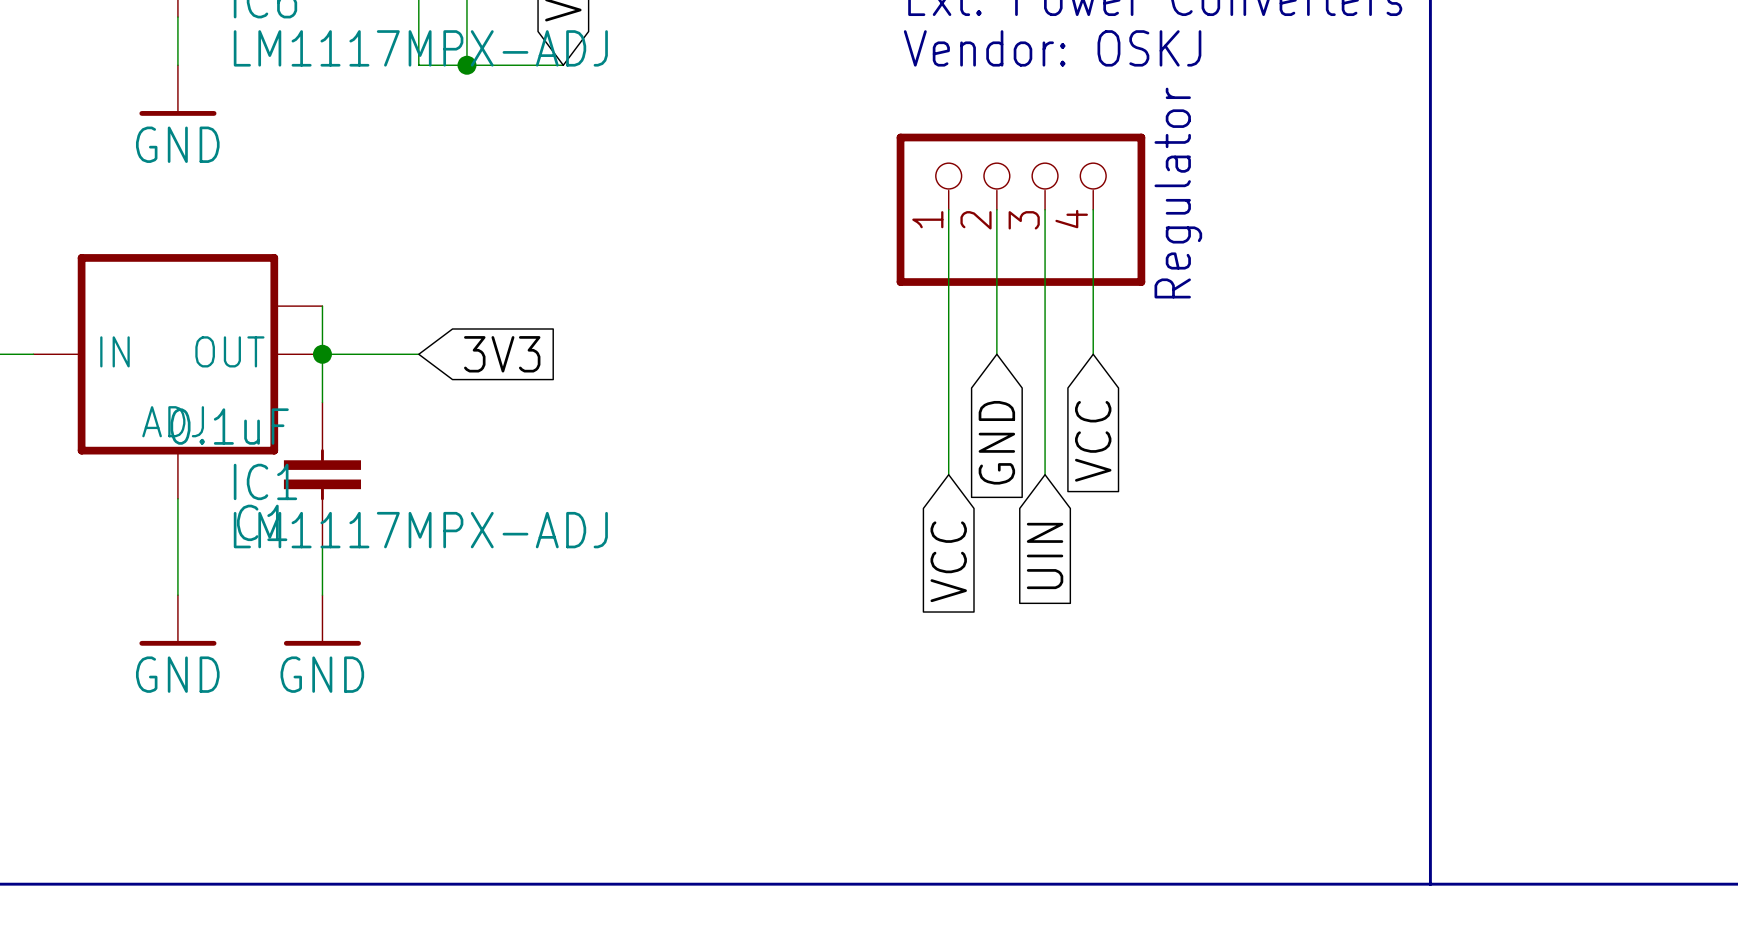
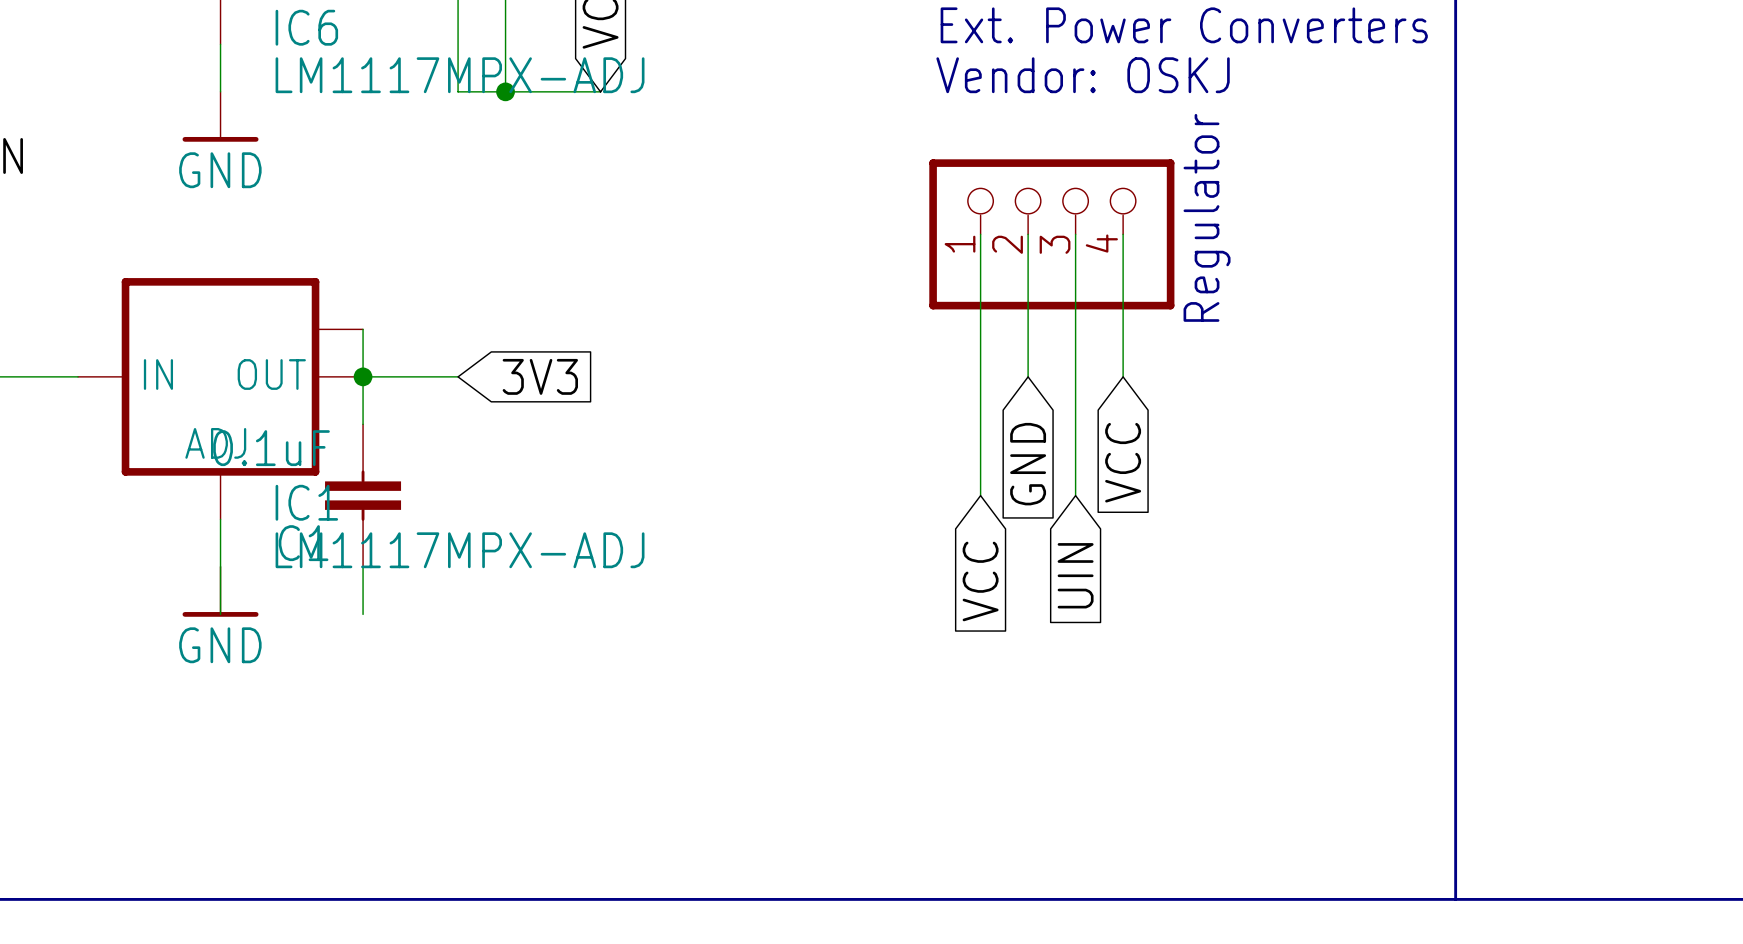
power symbol position: GND (177, 620) -> GND (220, 591)
power symbol: GND (322, 620) -> none

